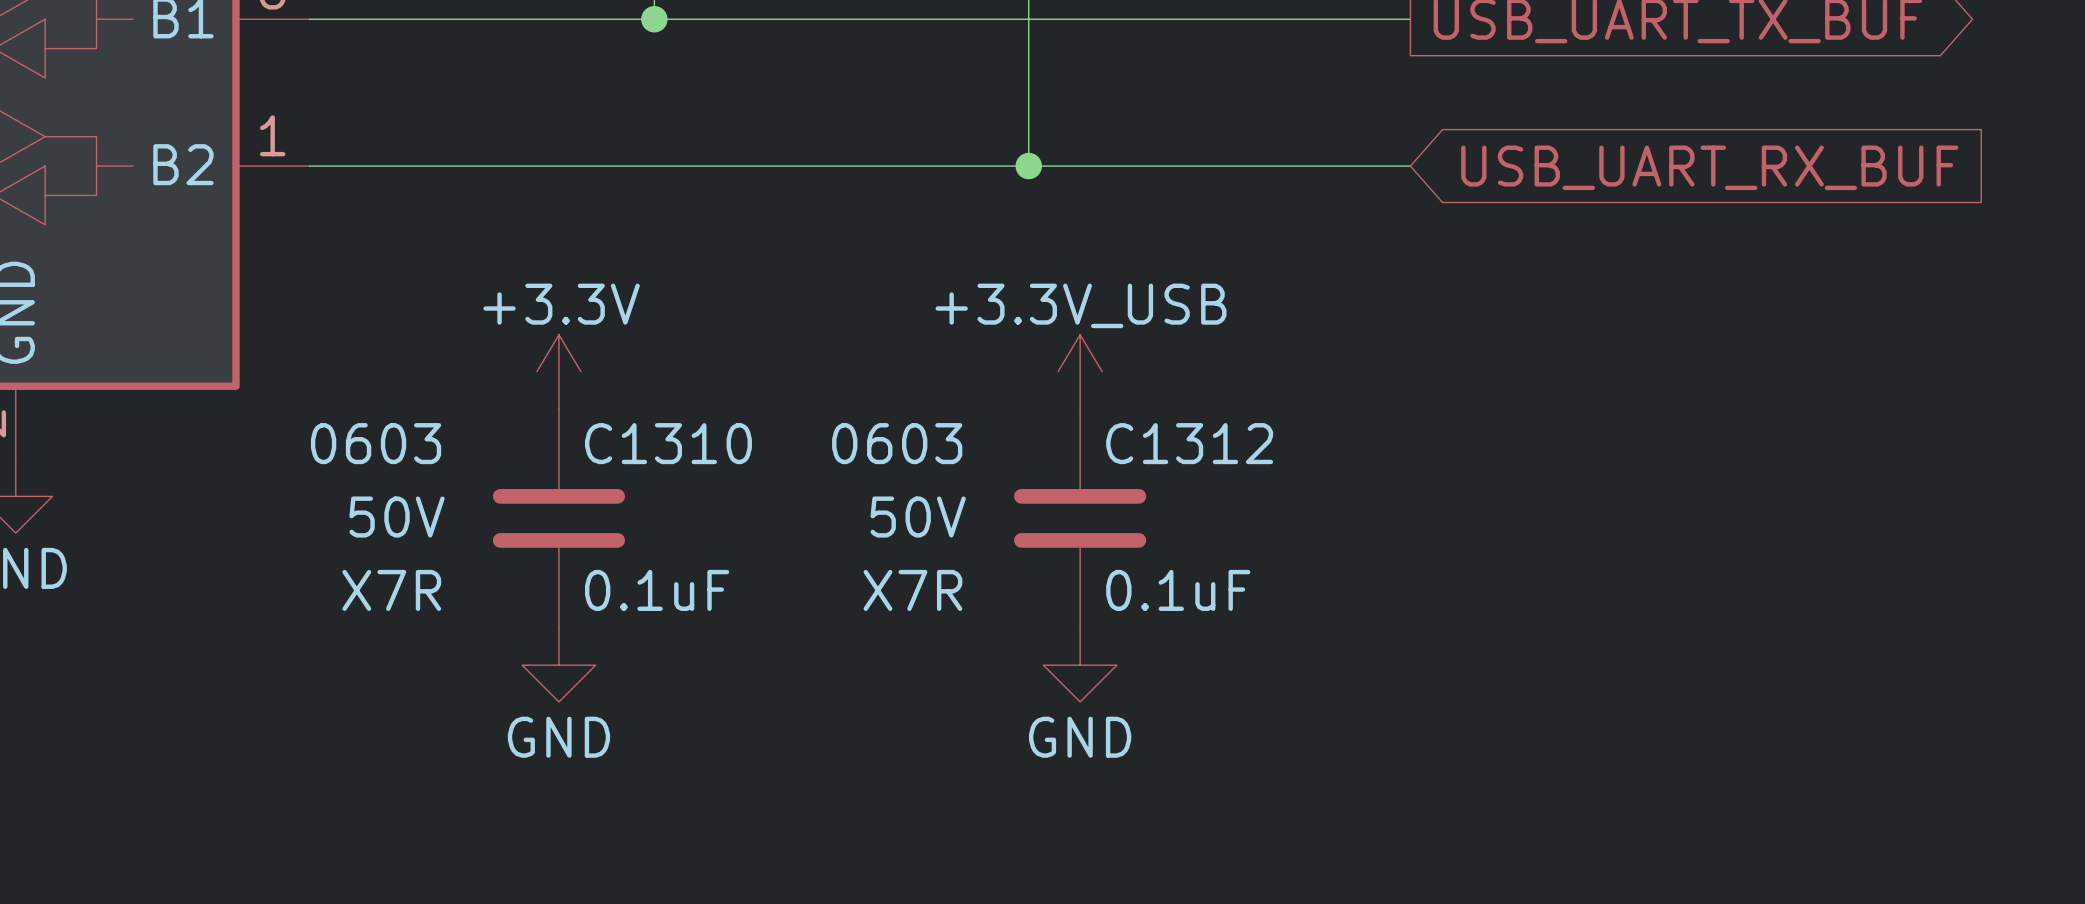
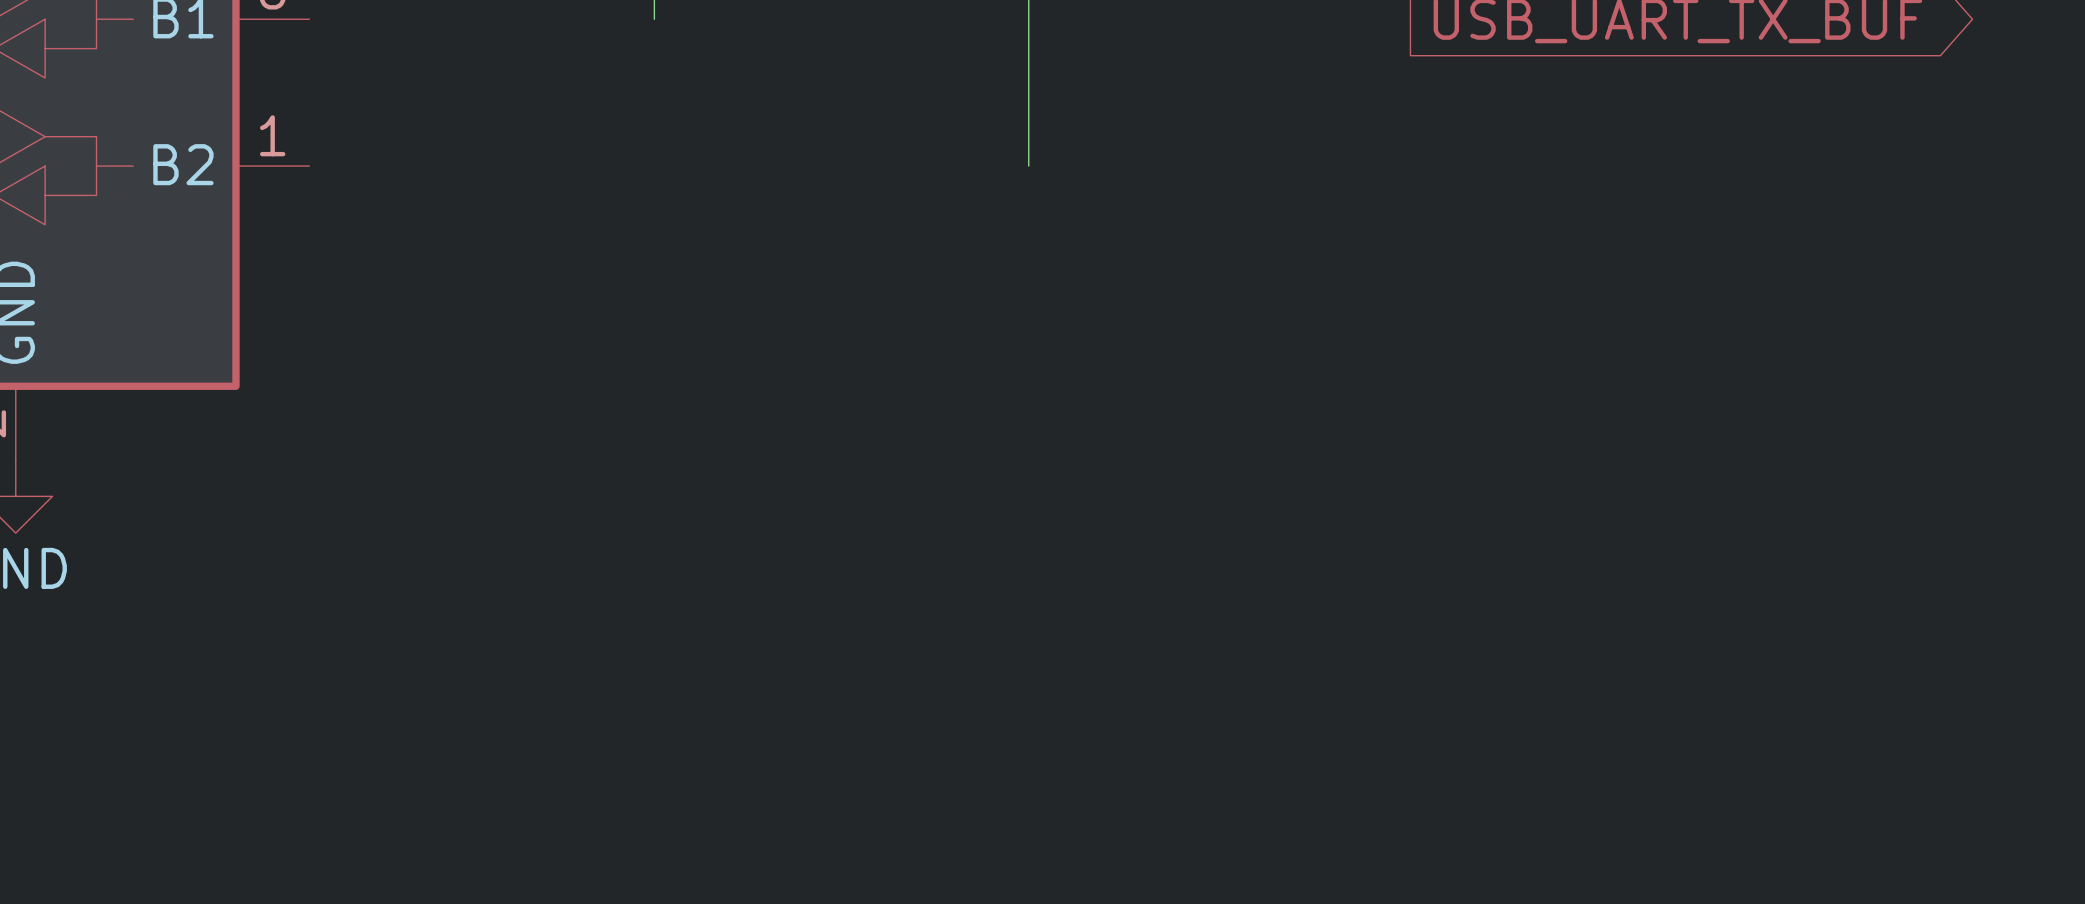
wire: (309, 19) (1410, 19) -> none
junction: (654, 19) -> none
wire: (309, 166) (1410, 166) -> none
junction: (1028, 166) -> none
global label: USB_UART_RX_BUF (1709, 167) -> none
power symbol: +3.3V (558, 371) -> none
power symbol: +3.3V_USB (1080, 371) -> none
C1310: 0.1uF (558, 518) -> none
C1312: 0.1uF (1080, 518) -> none
power symbol: GND (558, 665) -> none
power symbol: GND (1080, 665) -> none

